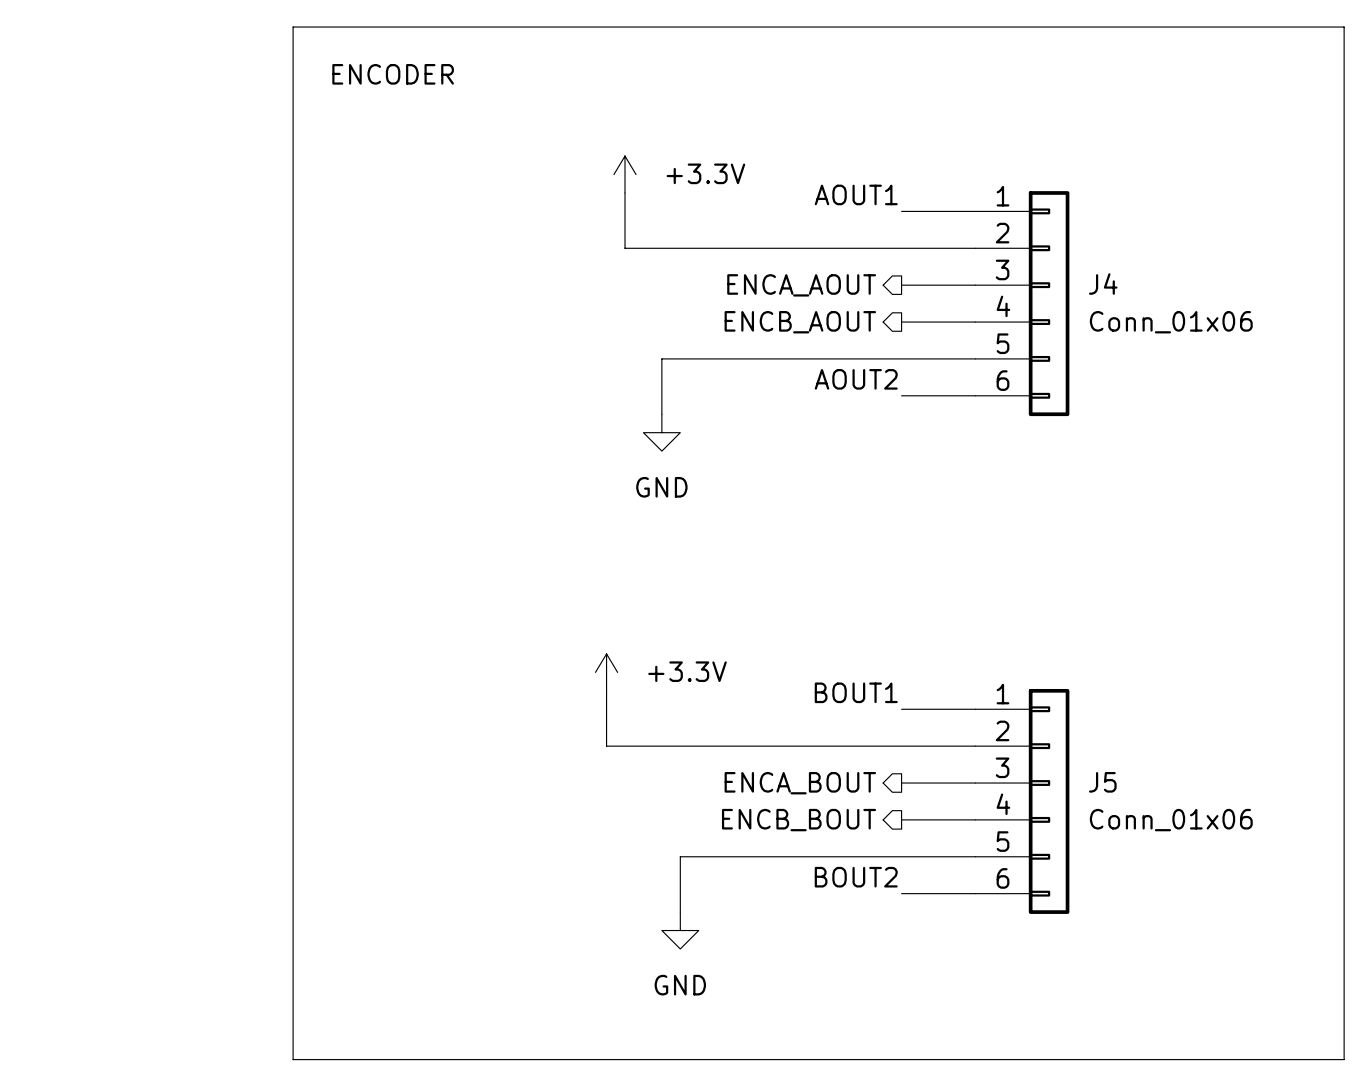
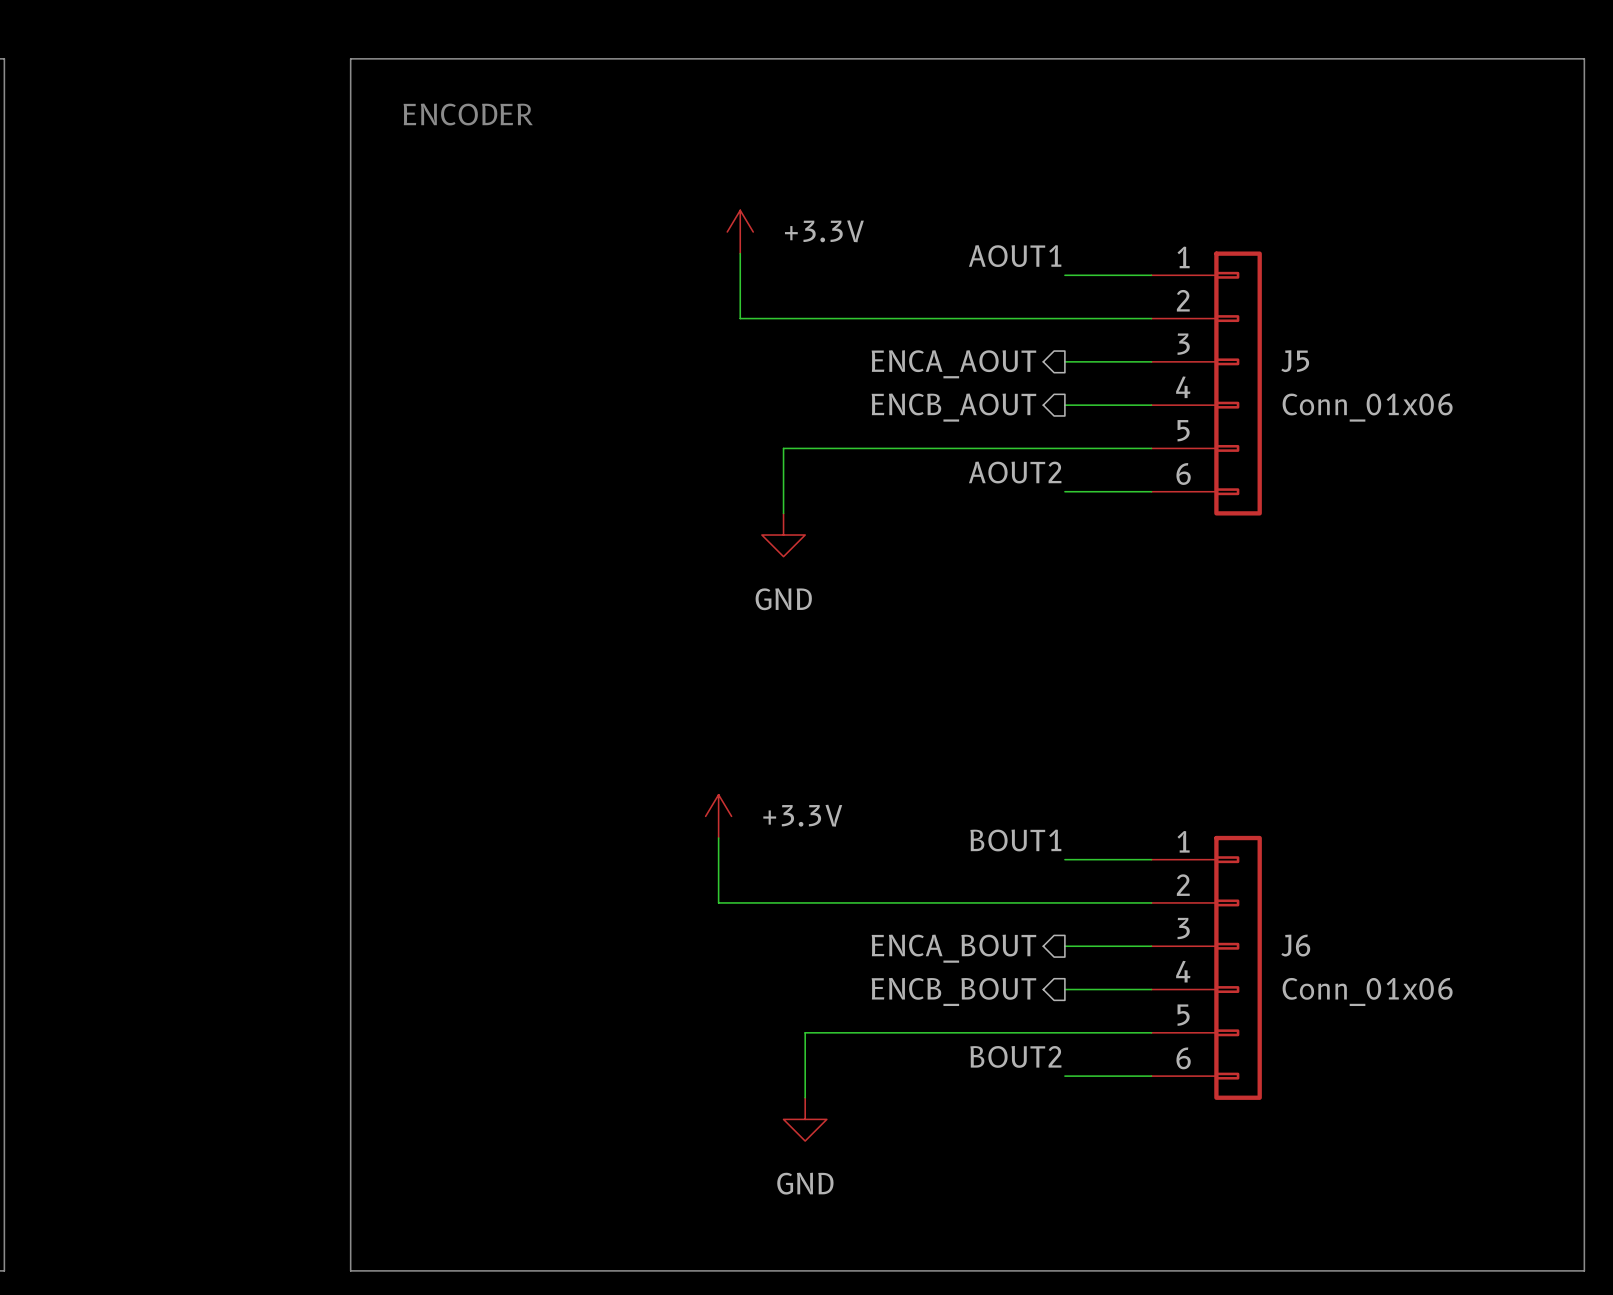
J4 name: J4 (1103, 284) -> J5 (1295, 361)
J5 name: J5 (1102, 782) -> J6 (1295, 945)

